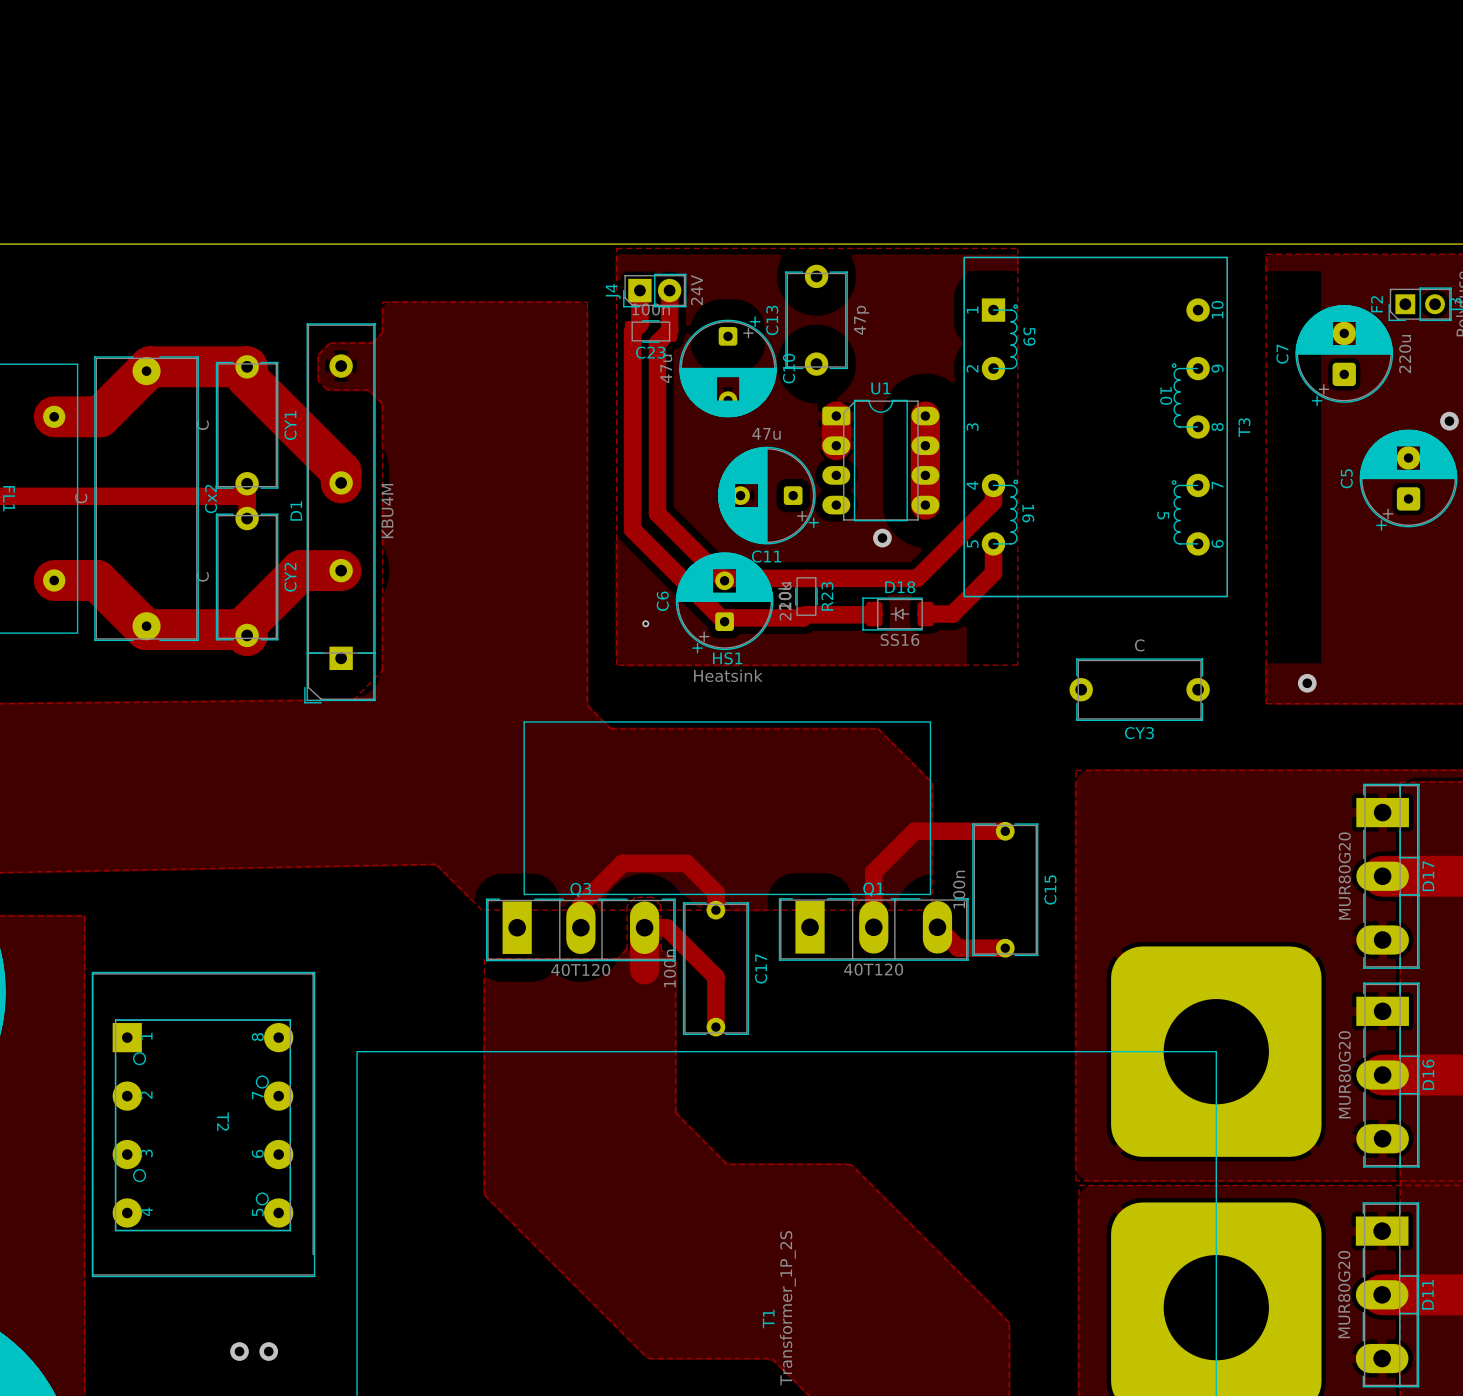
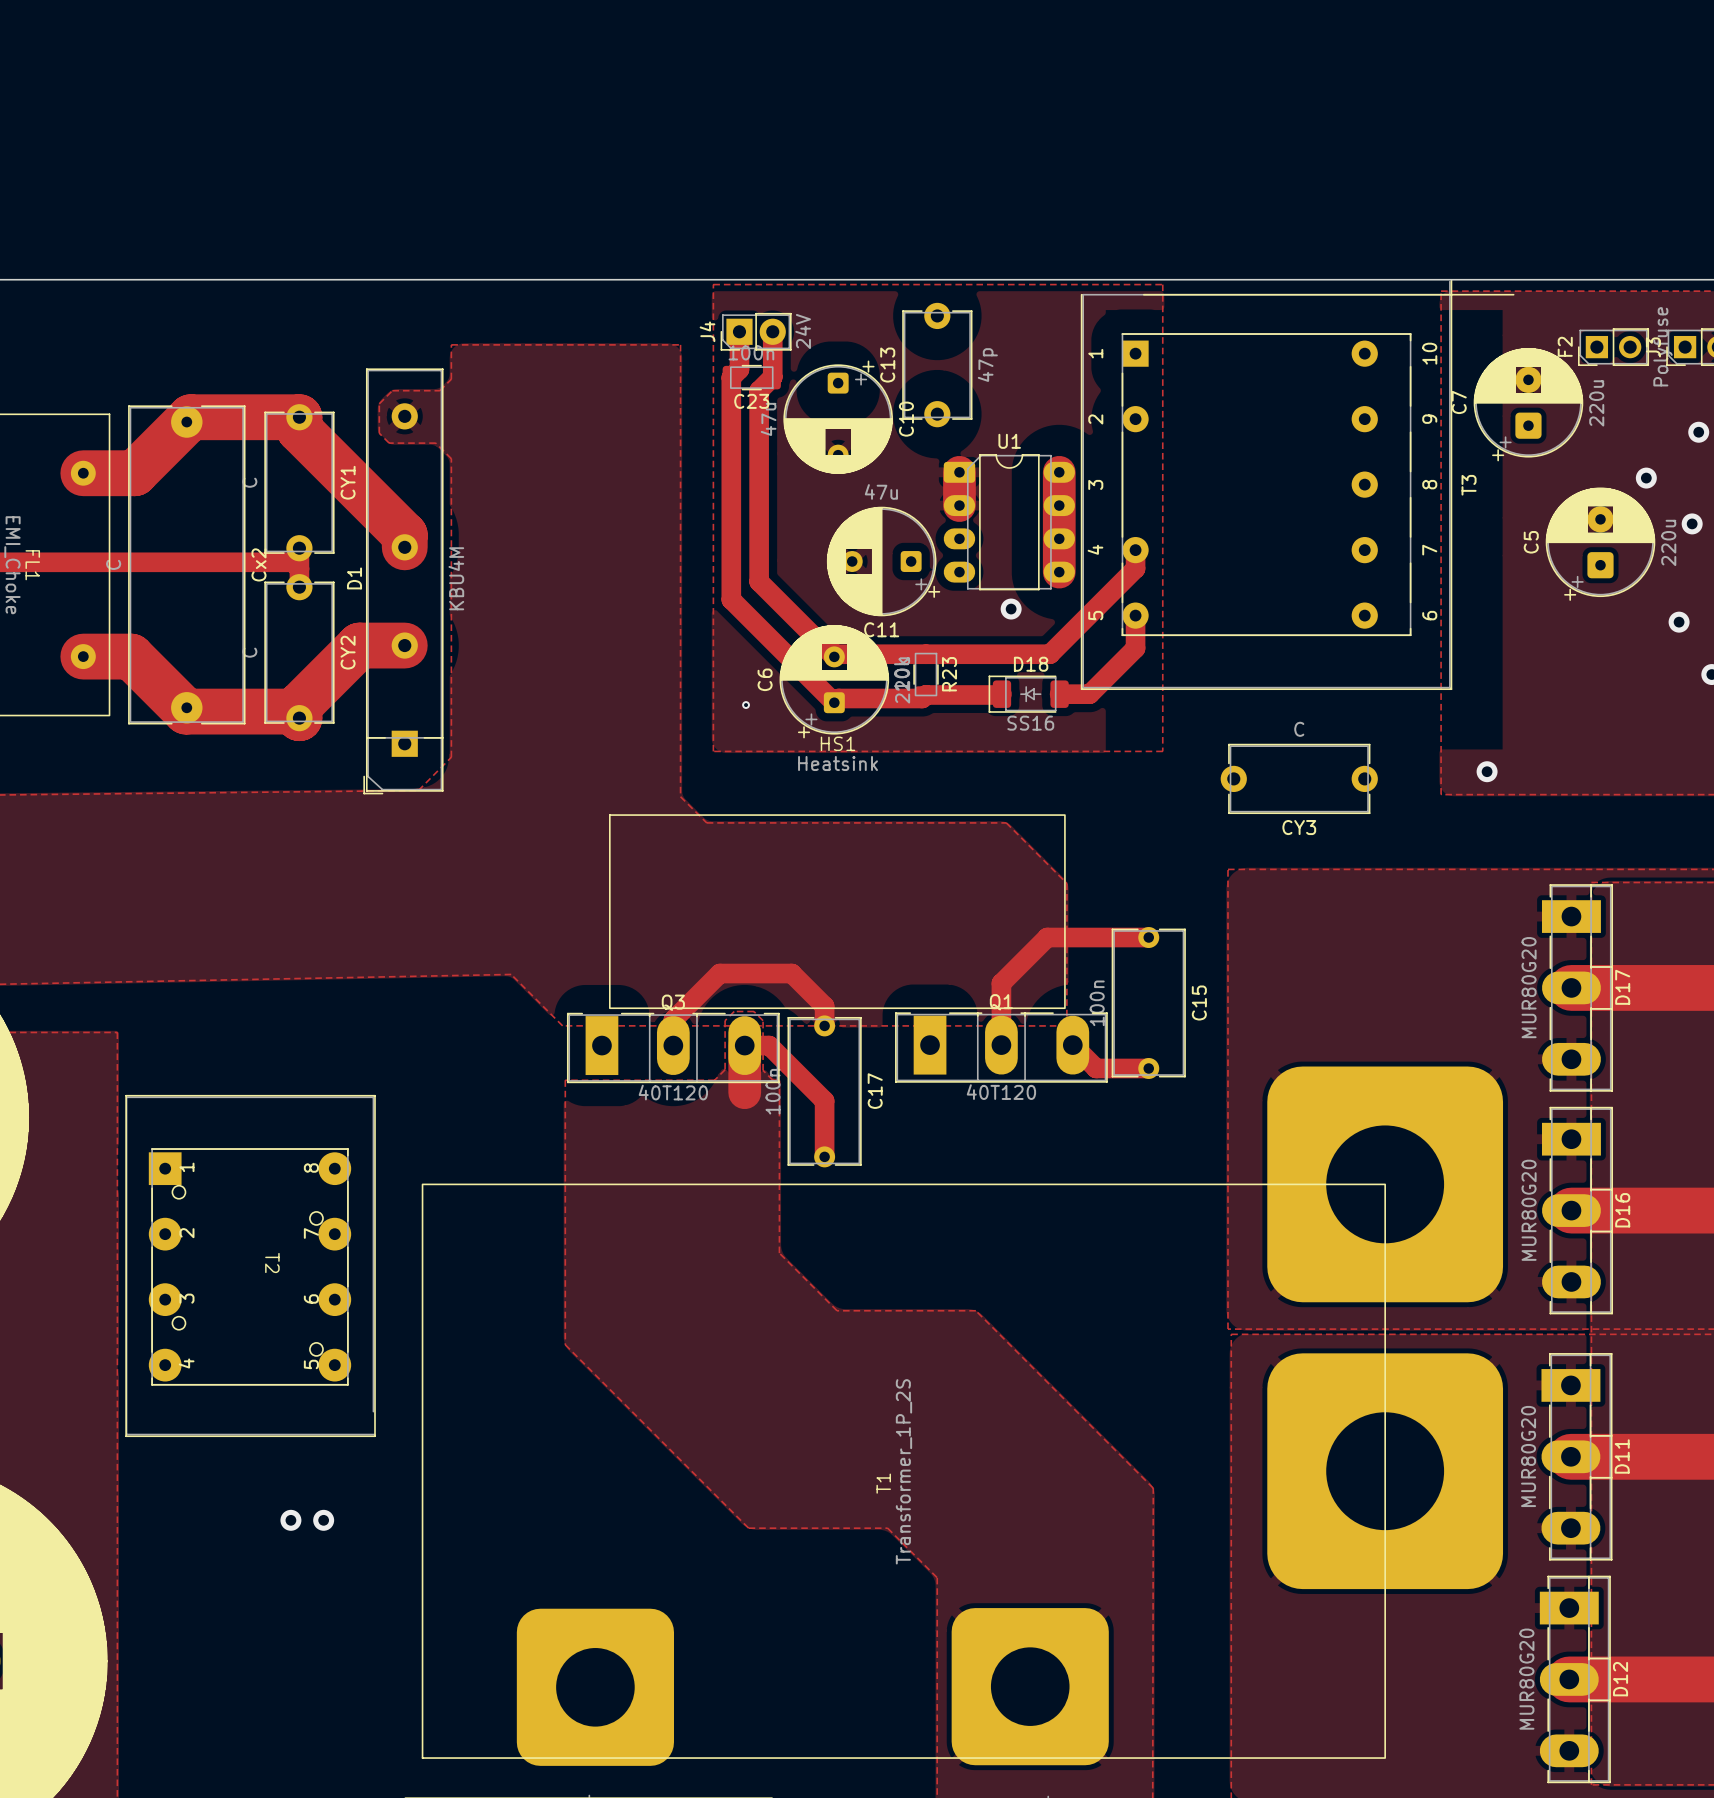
T3 footprint: [963, 256, 1228, 598] -> [1080, 279, 1515, 690]

